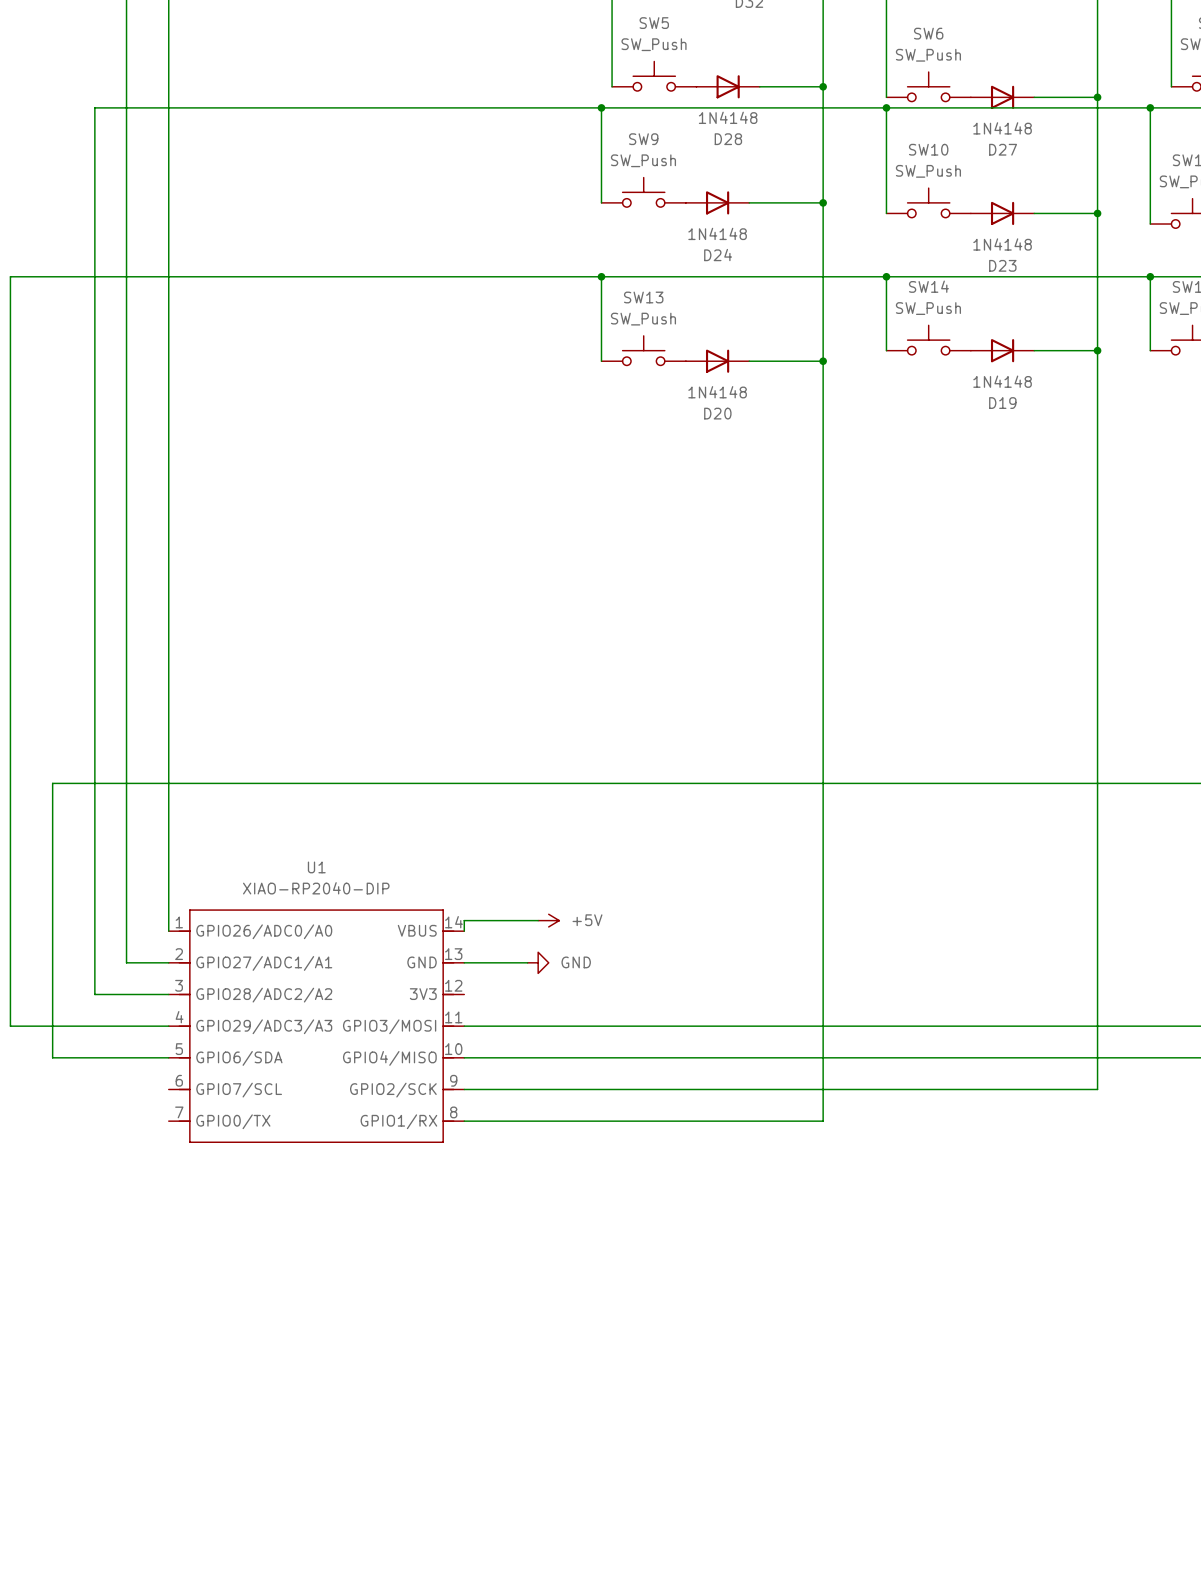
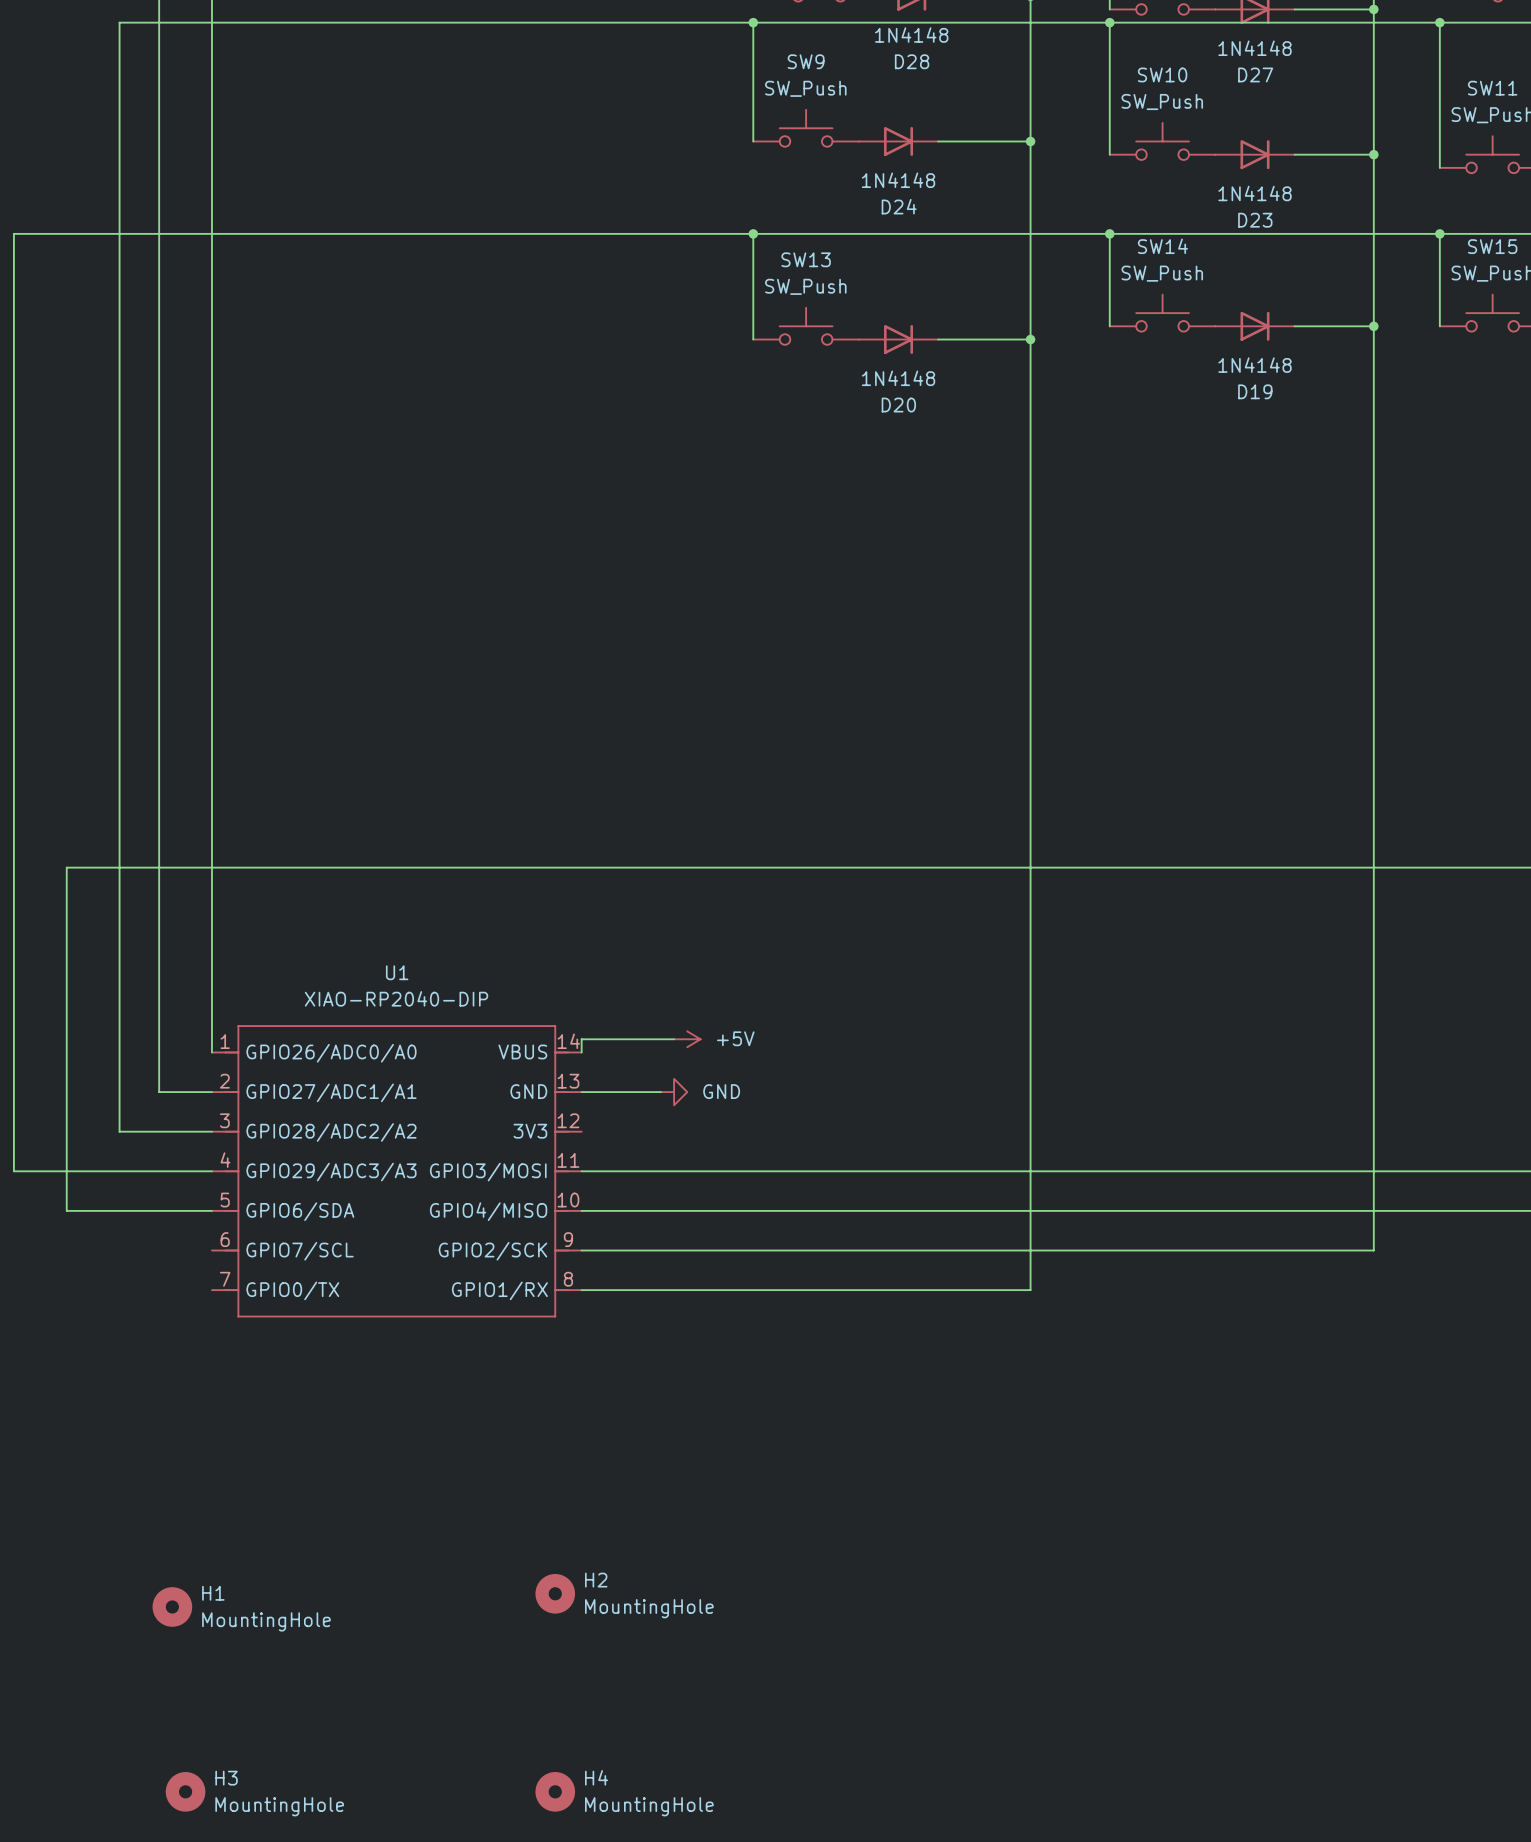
H2: none -> MountingHole (555, 1593)
H1: none -> MountingHole (172, 1606)
H3: none -> MountingHole (185, 1791)
H4: none -> MountingHole (555, 1791)

